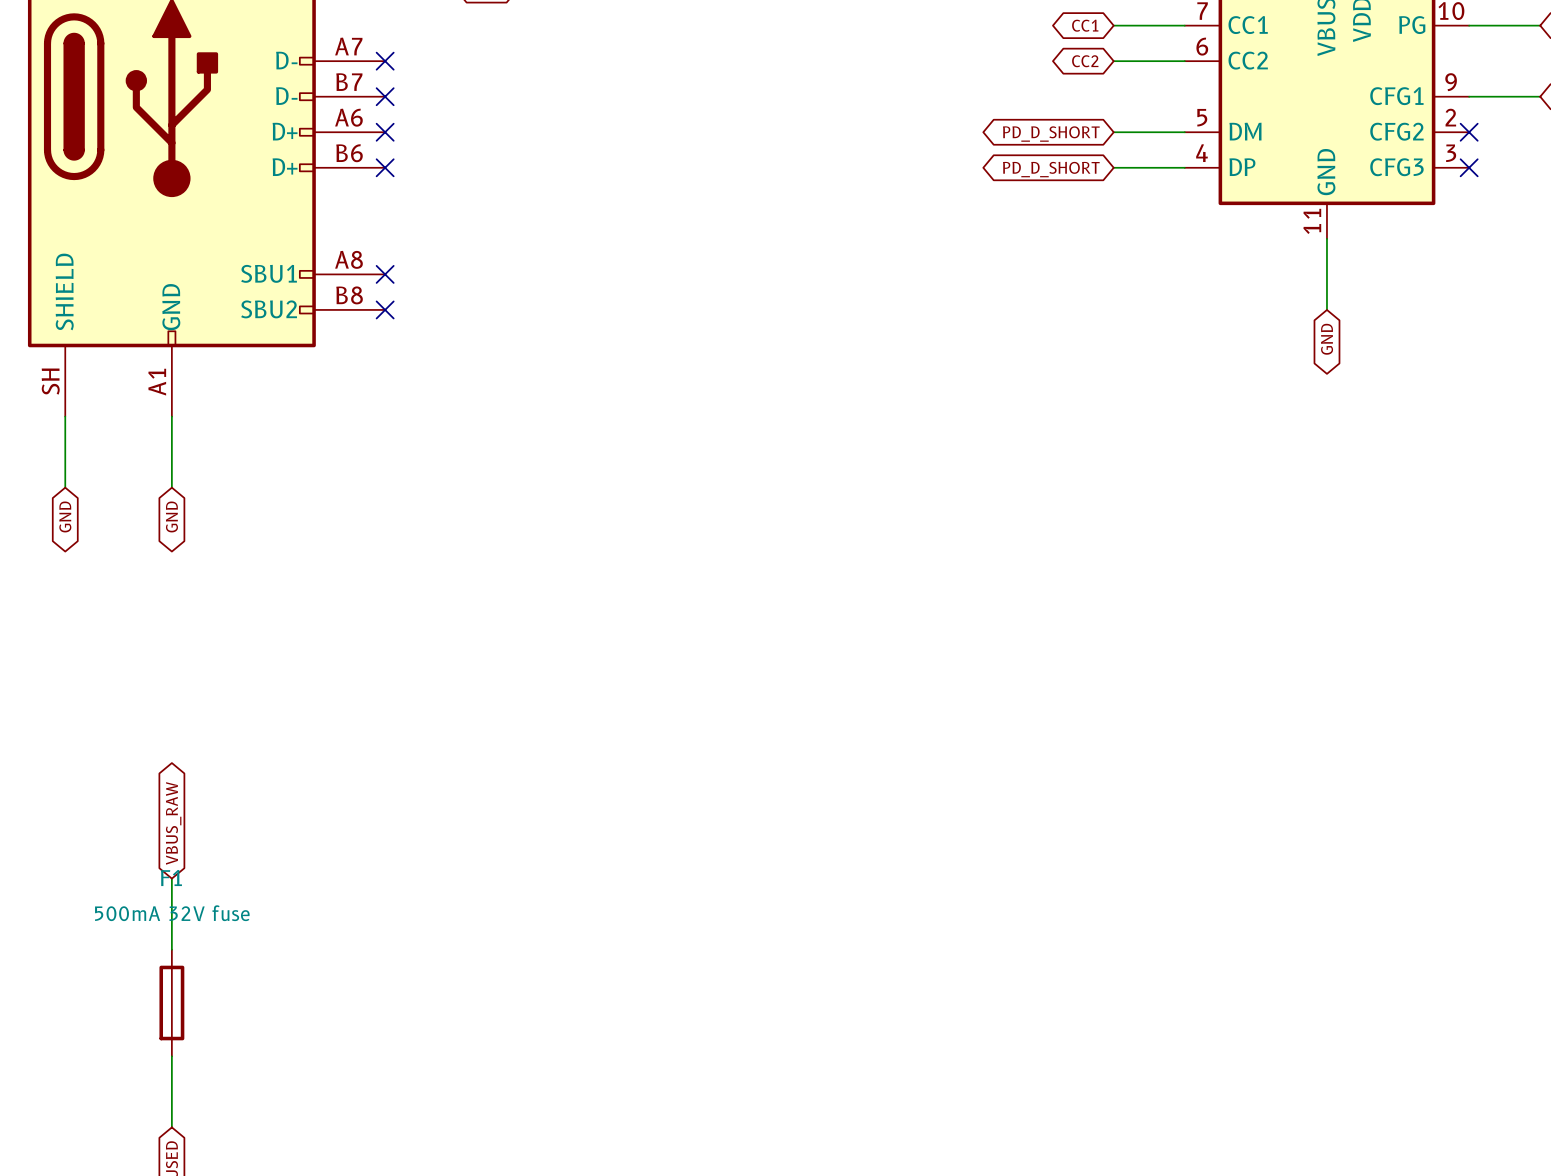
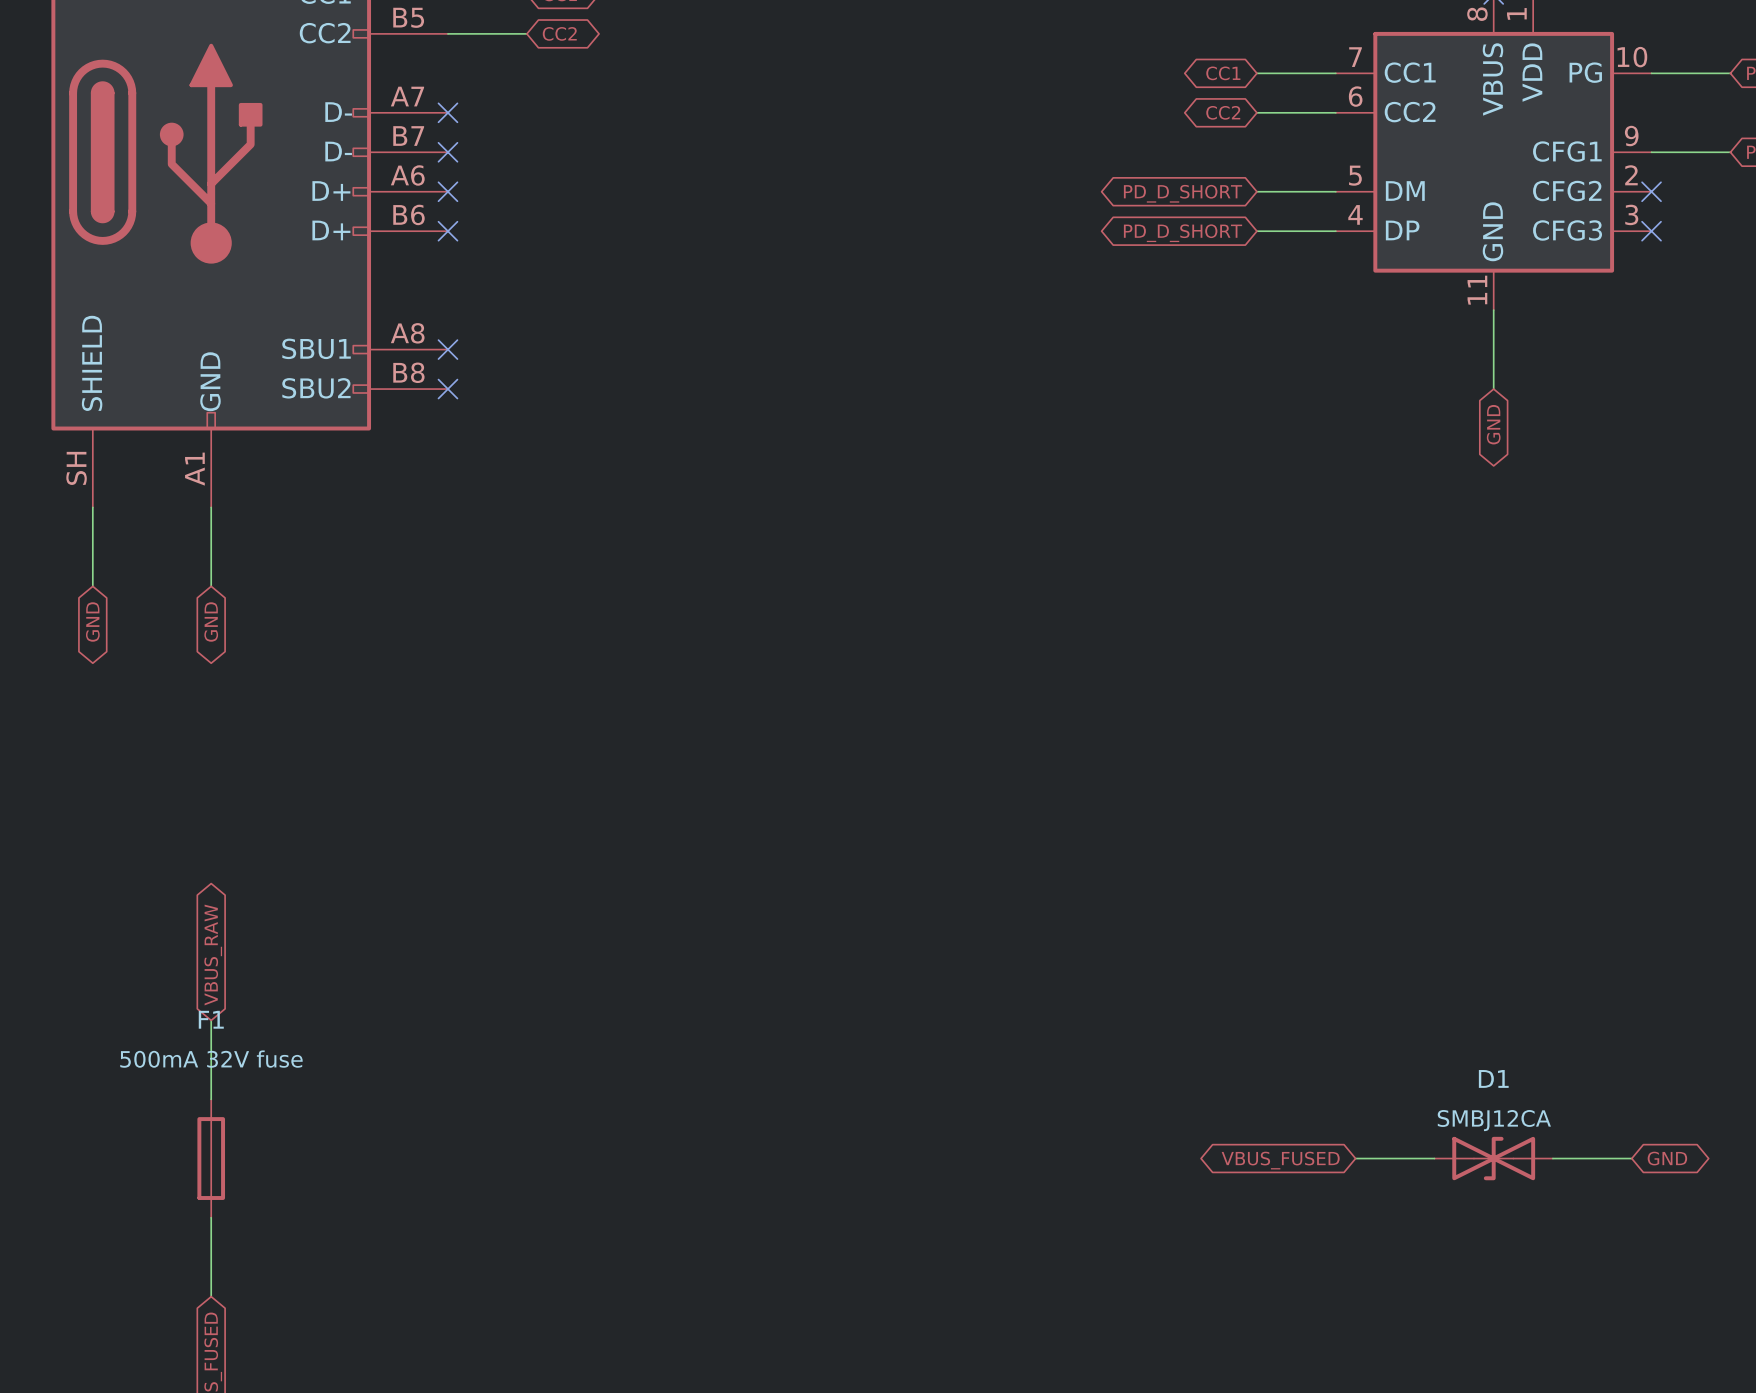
wire: none -> (1355, 1158) (1434, 1158)
D1: none -> SMBJ12CA (1493, 1158)
wire: none -> (1552, 1158) (1631, 1158)
global label: none -> GND (1667, 1158)
global label: none -> VBUS_FUSED (1280, 1160)

